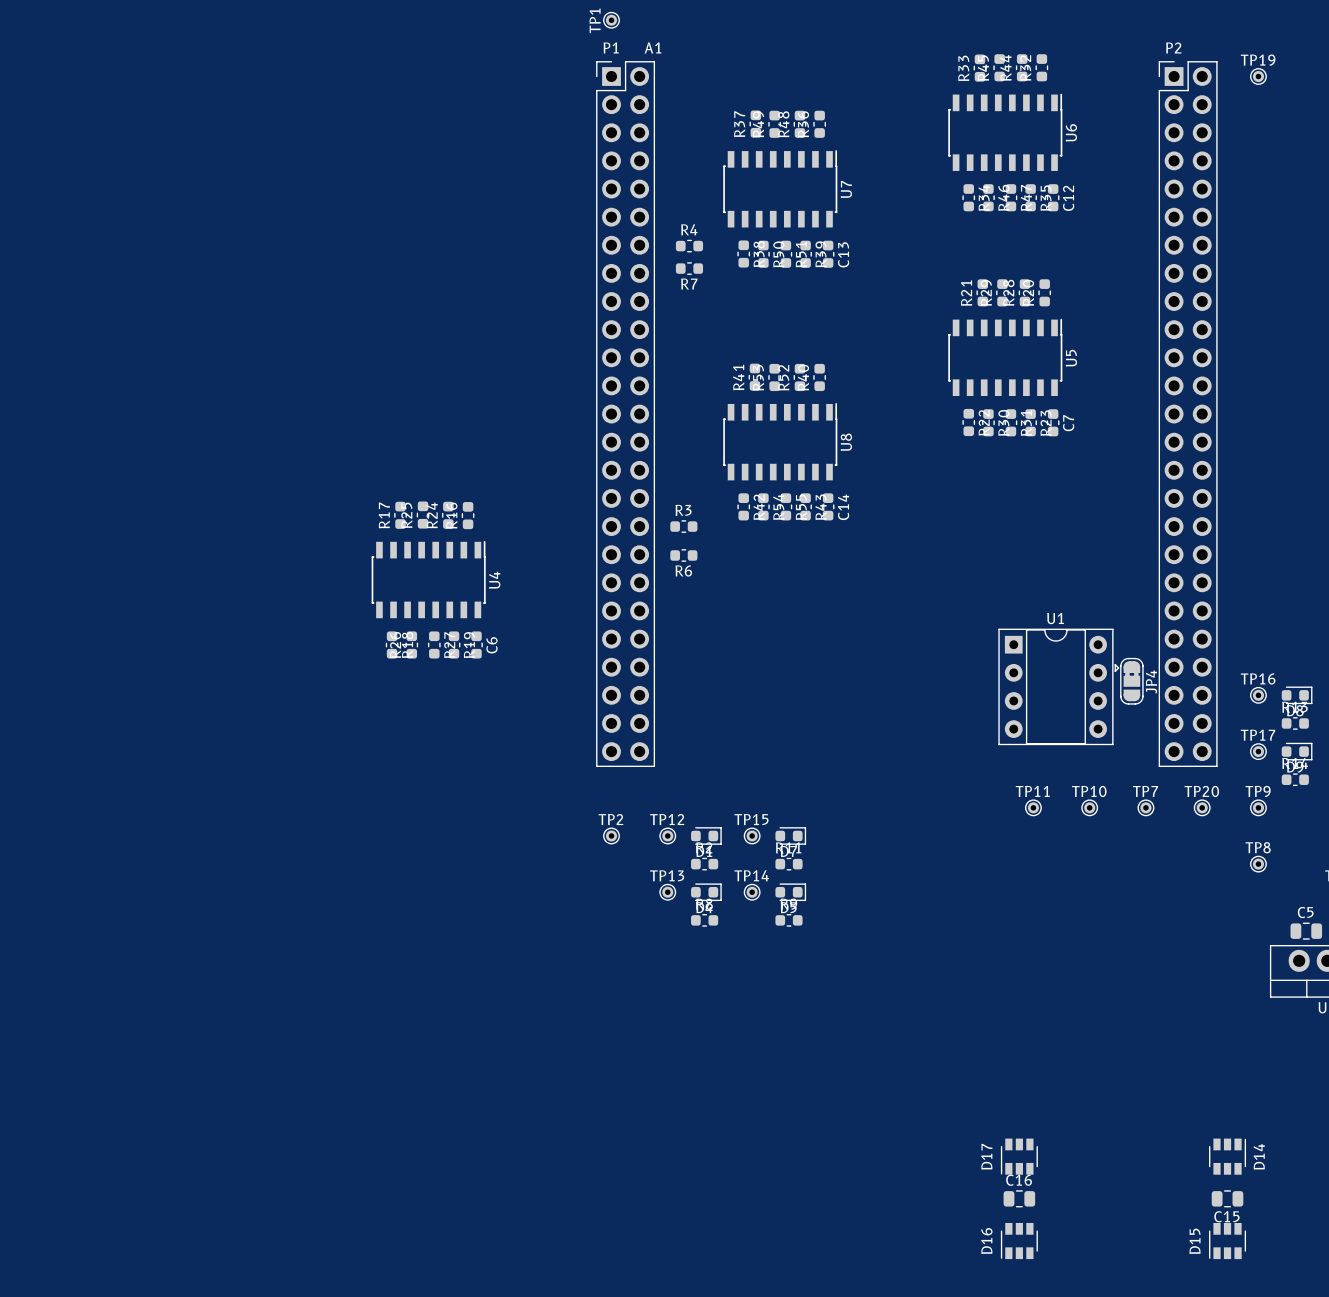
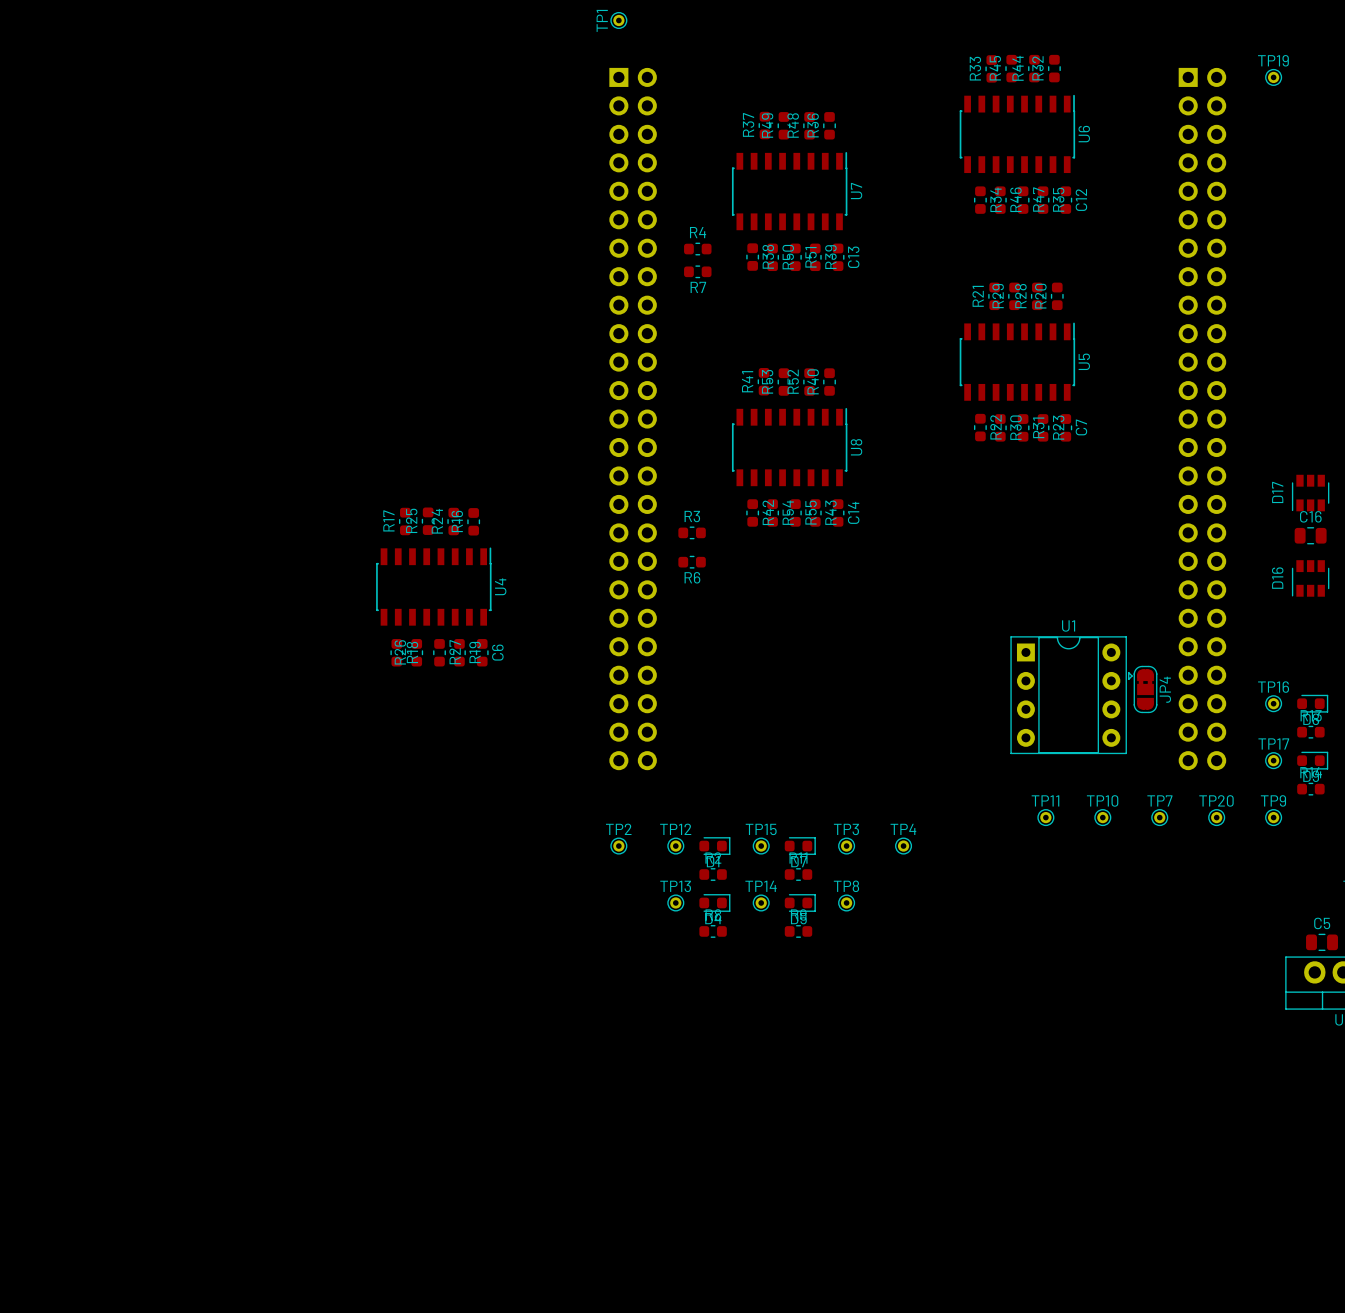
A1: (906, 414) -> none
TP3: none -> (846, 846)
TP4: none -> (903, 846)
TP8 position: (1258, 864) -> (846, 902)
D17 position: (1019, 1156) -> (1310, 493)
D14: (1227, 1156) -> none
C16 position: (1019, 1198) -> (1310, 535)
C15: (1227, 1198) -> none
D16 position: (1019, 1241) -> (1310, 578)
D15: (1227, 1241) -> none

